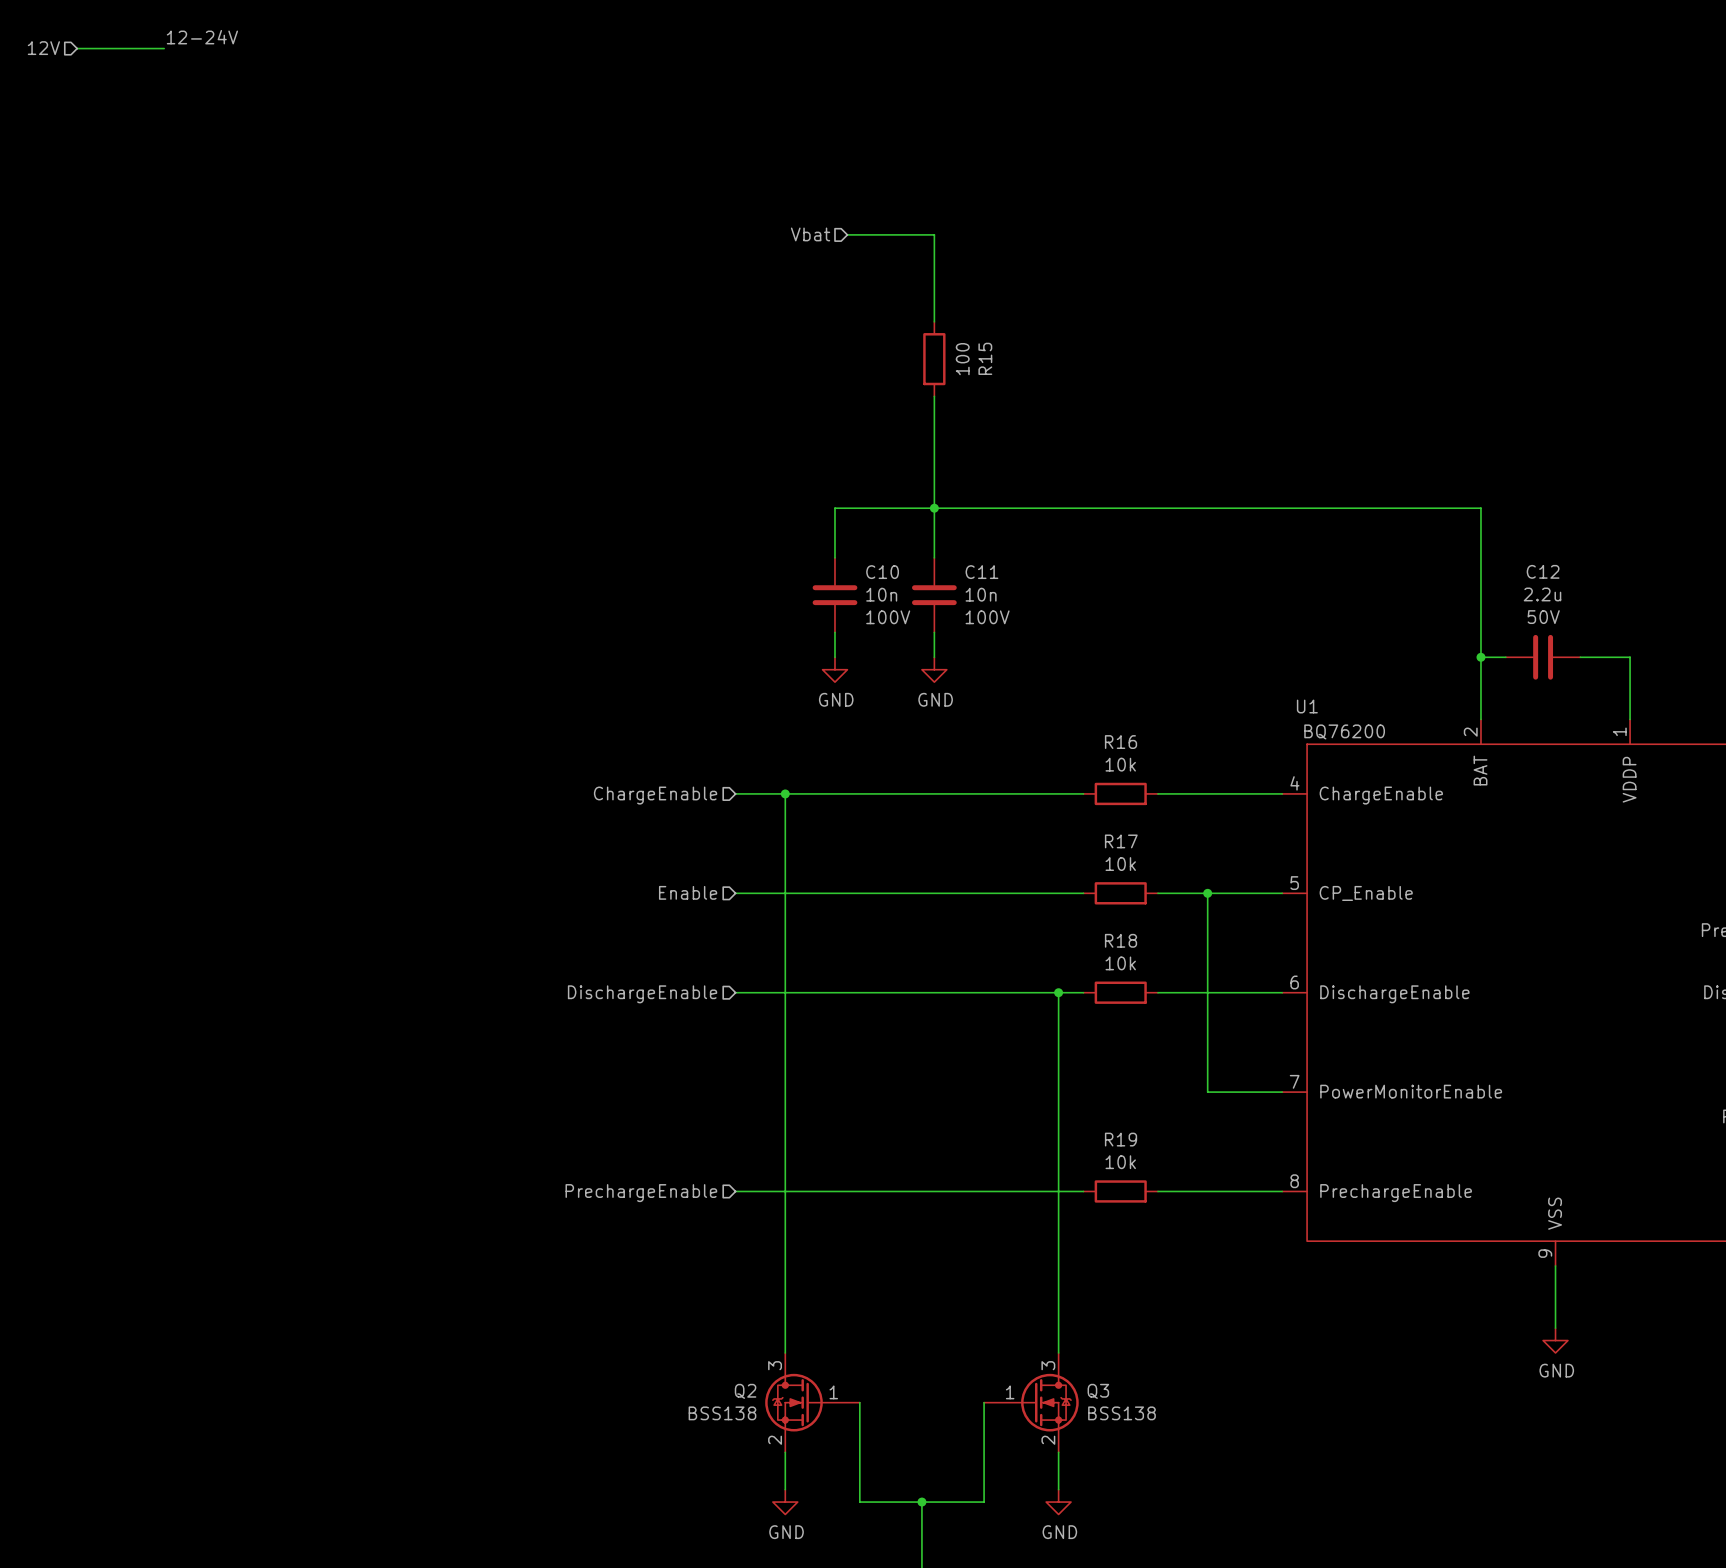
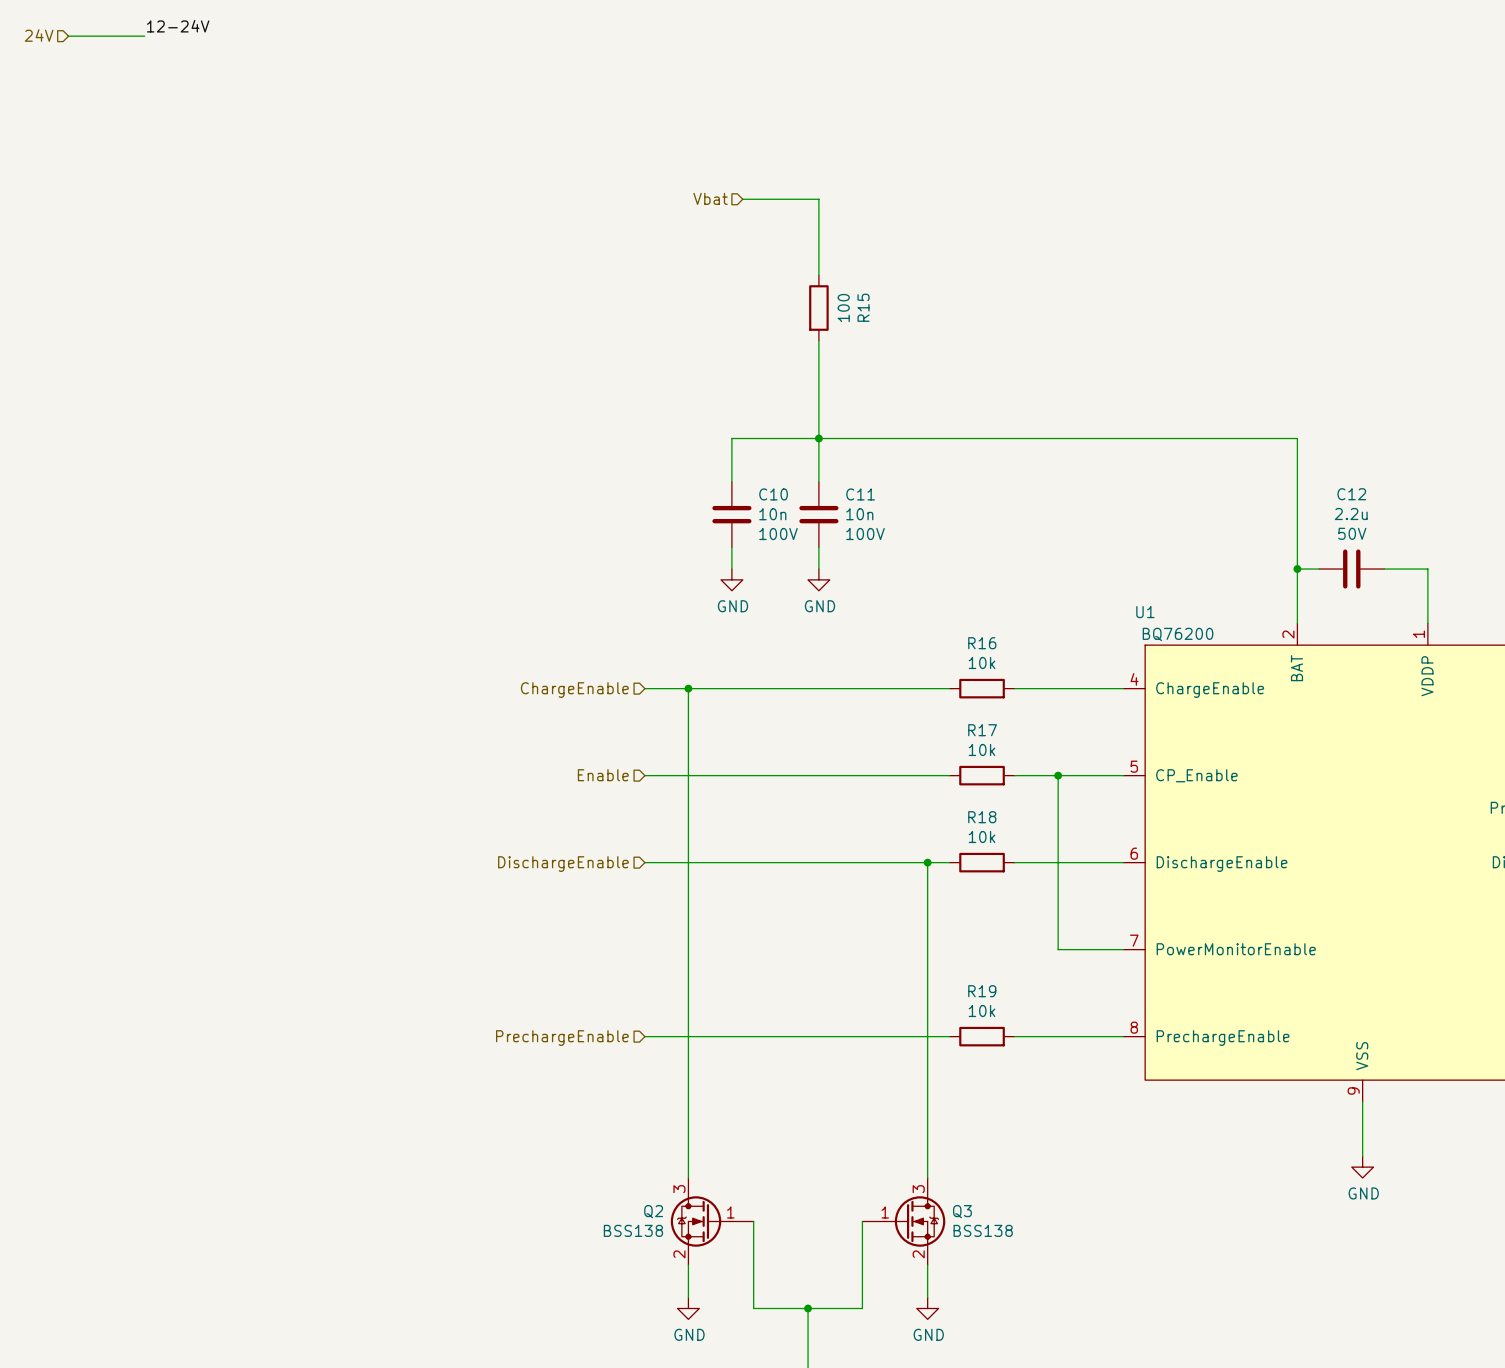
hierarchical label: 12V (43, 48) -> 24V (39, 35)

